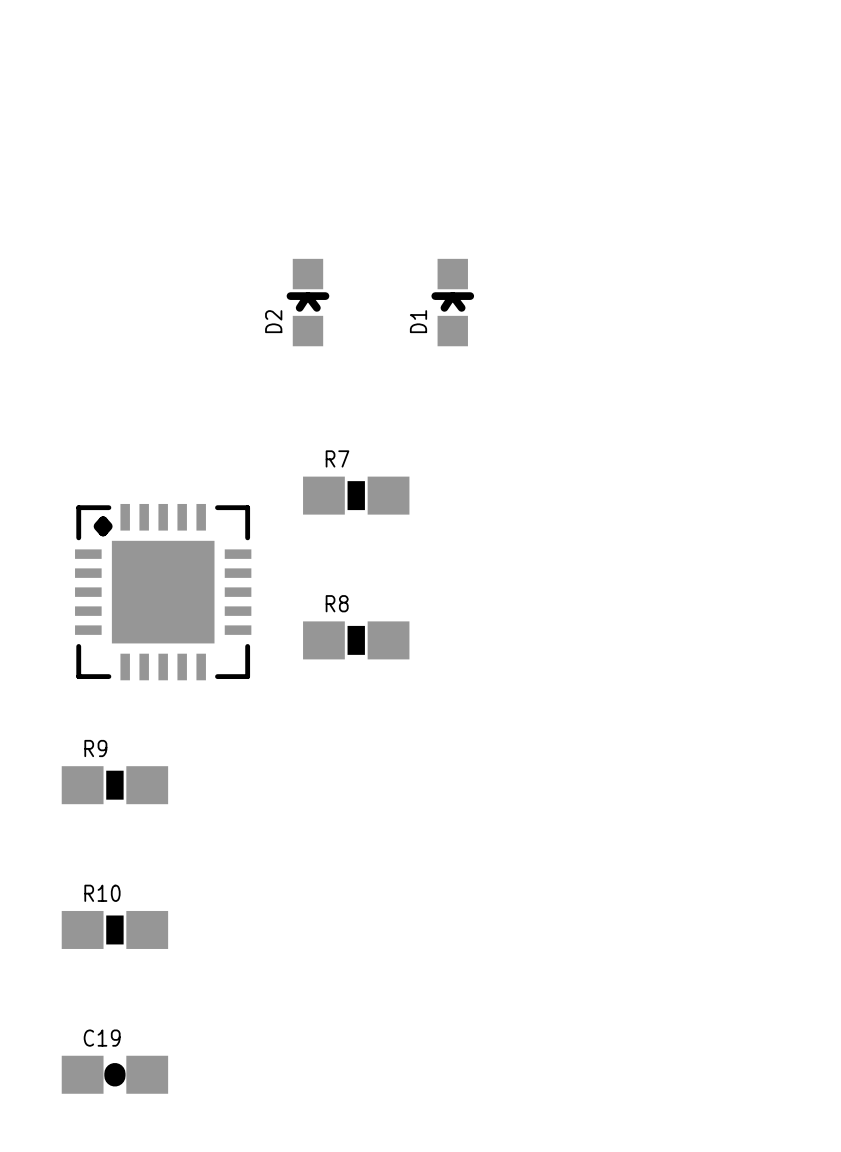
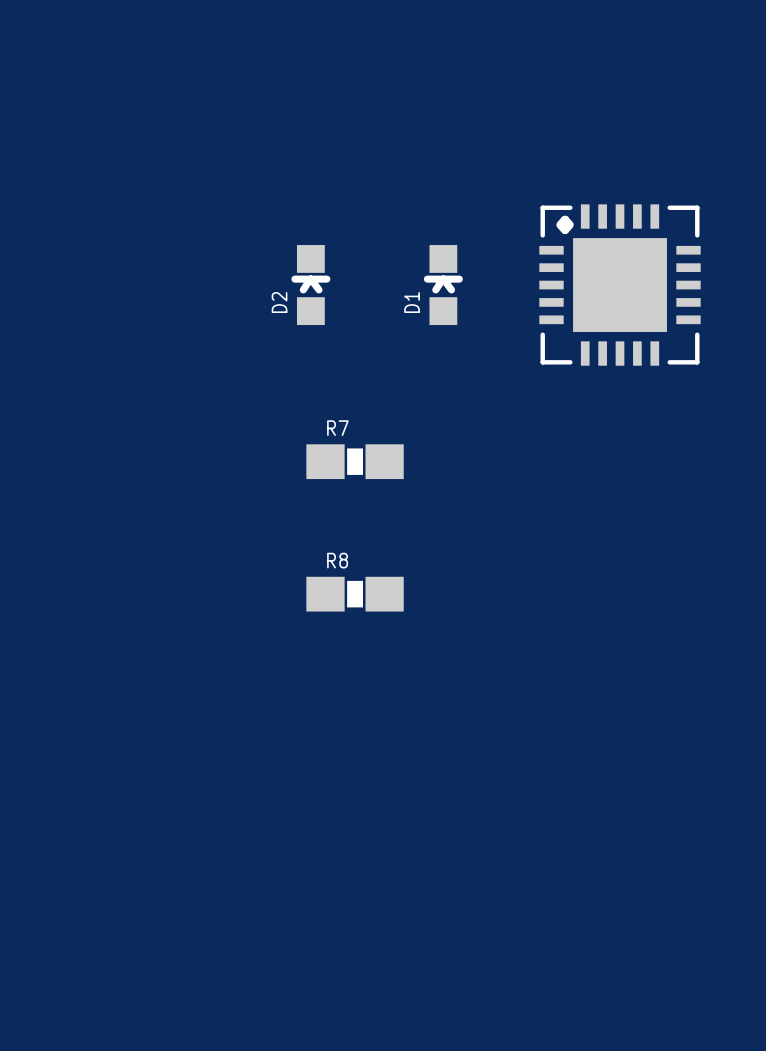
part position: (163, 592) -> (620, 285)
R9: (114, 785) -> none
R10: (114, 929) -> none
C19: (114, 1074) -> none

